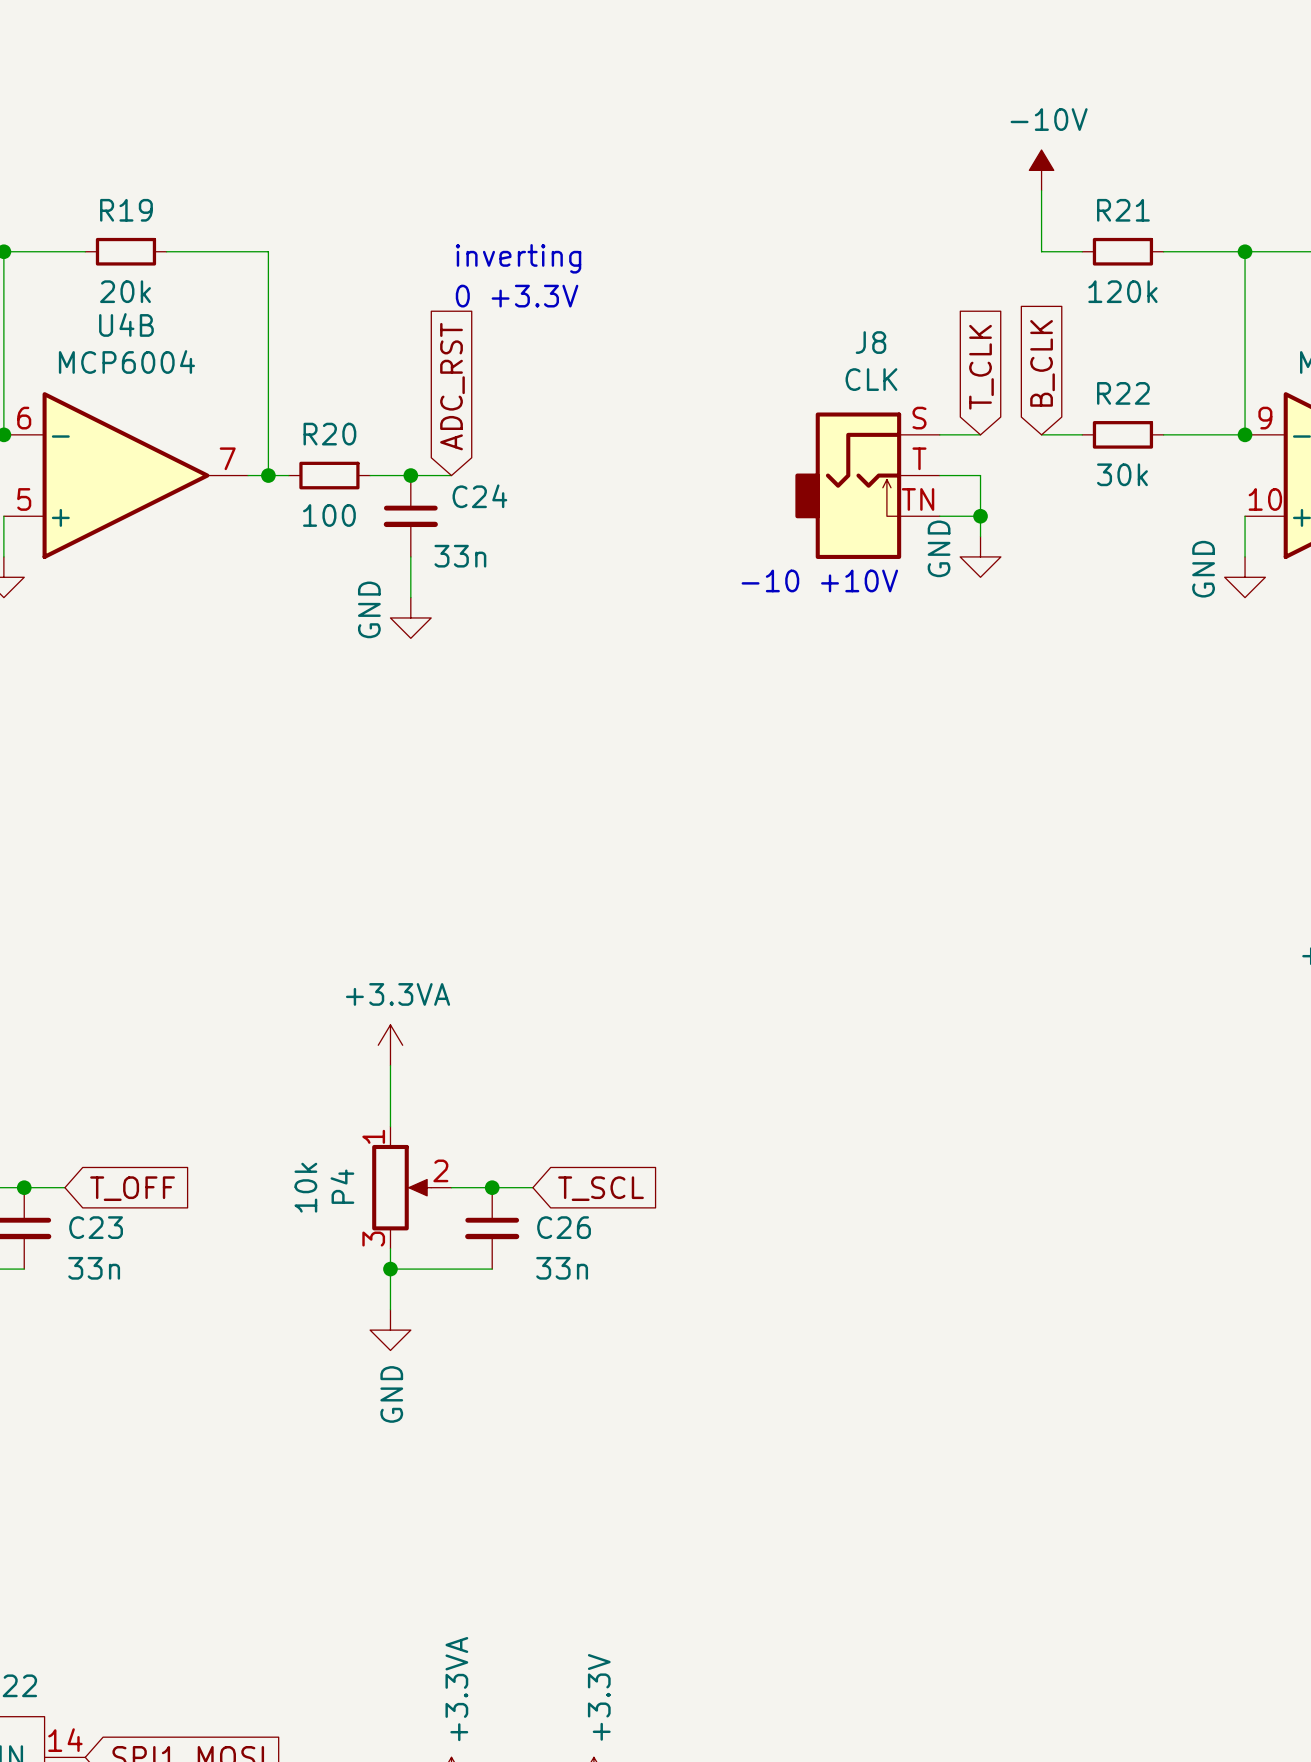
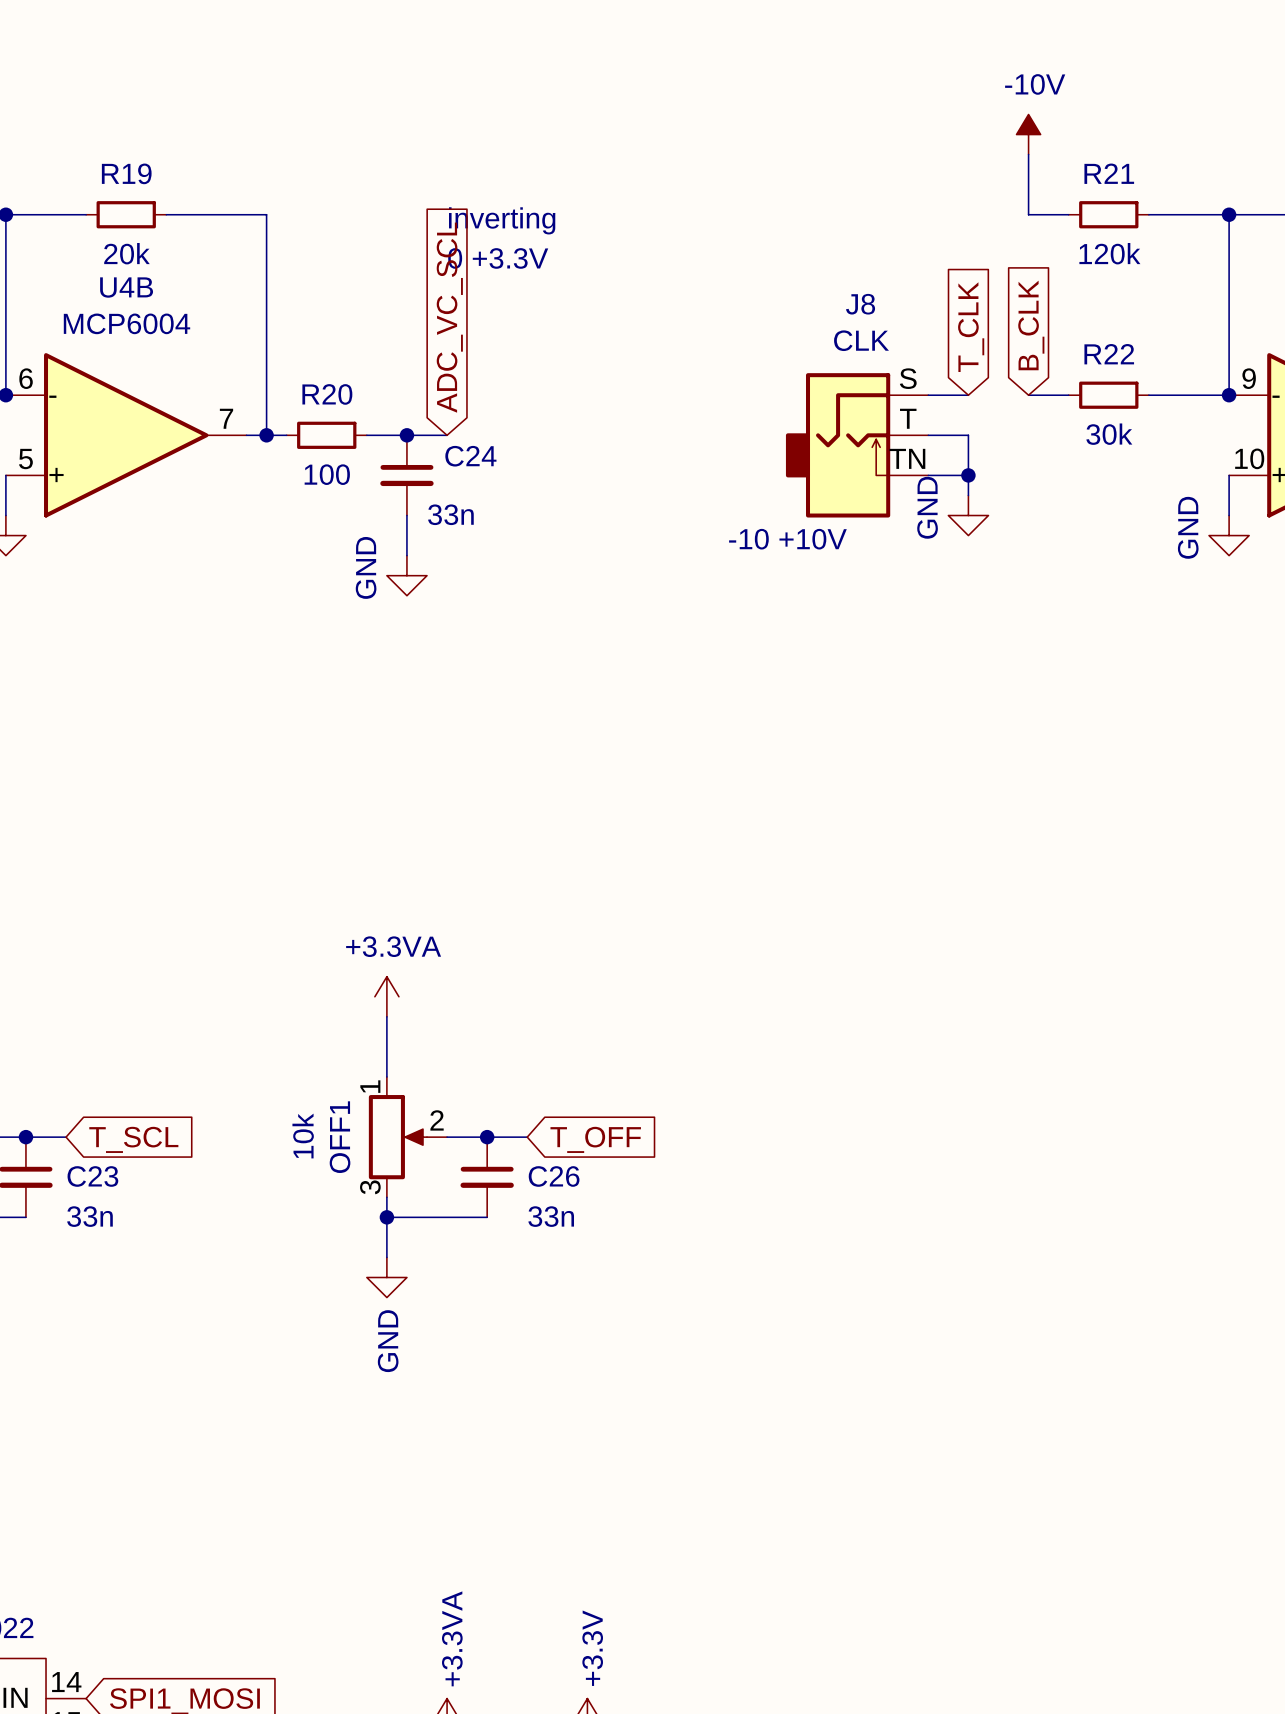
global label: ADC_RST (452, 386) -> ADC_VC_SCL (449, 317)
P4 name: P4 (342, 1186) -> OFF1 (340, 1137)
global label: T_OFF (132, 1188) -> T_SCL (133, 1139)
global label: T_SCL (600, 1188) -> T_OFF (595, 1139)

